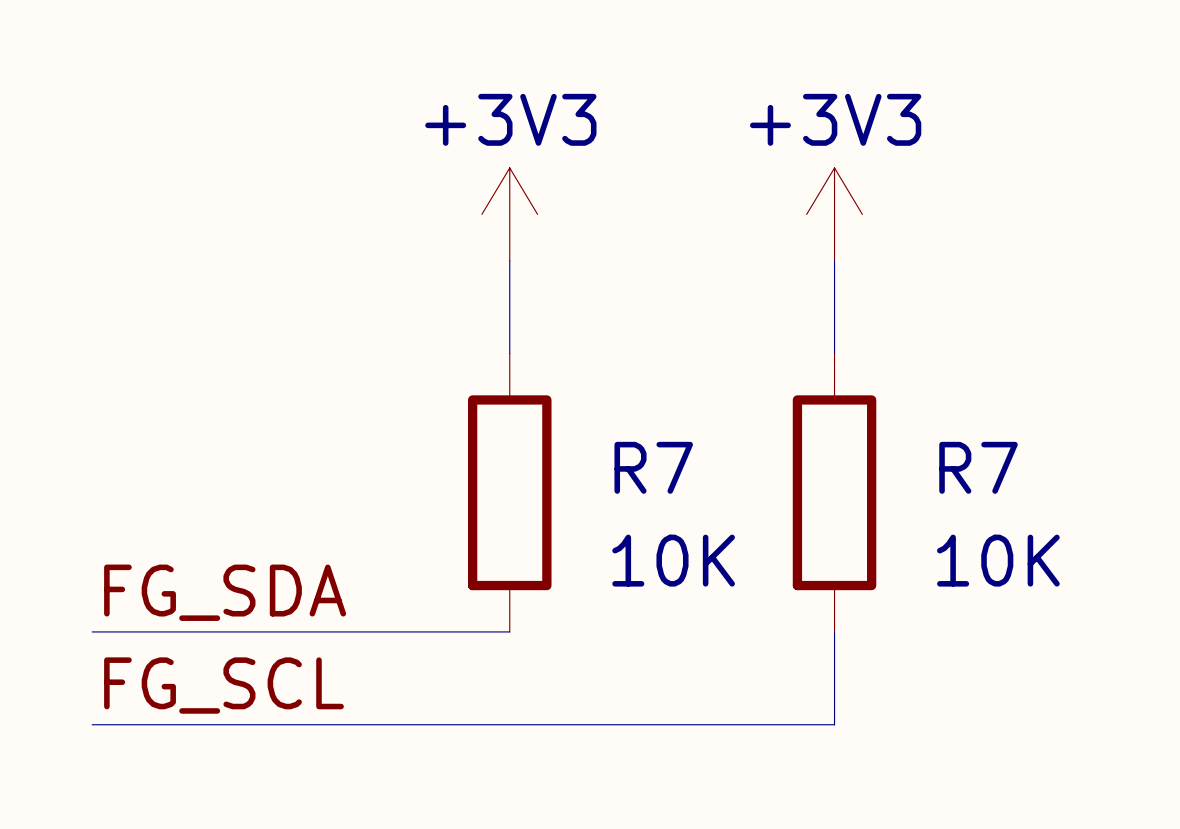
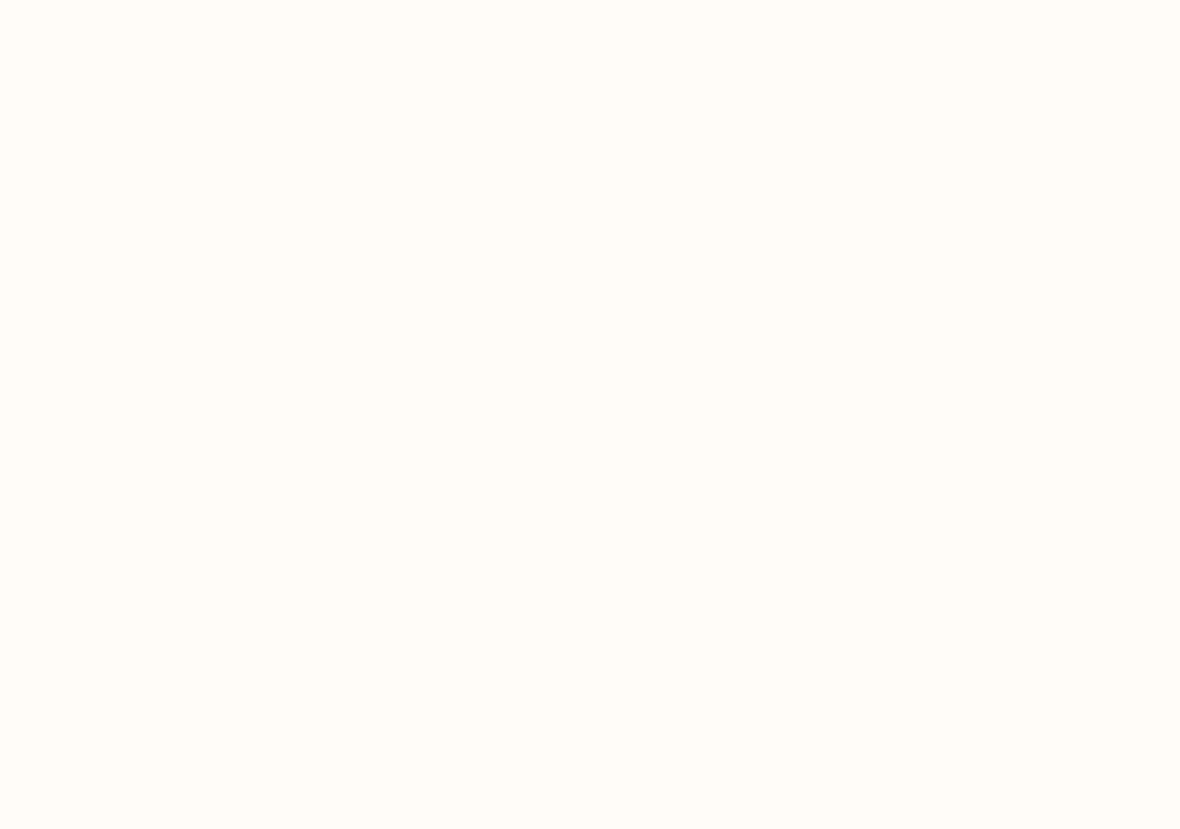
power symbol: +3V3 (509, 214) -> none
power symbol: +3V3 (834, 214) -> none
wire: (509, 260) (509, 353) -> none
wire: (834, 260) (834, 353) -> none
R7: 10K (509, 492) -> none
R7: 10K (834, 492) -> none
label: FG_SDA (225, 592) -> none
wire: (92, 631) (509, 631) -> none
wire: (834, 631) (834, 724) (92, 724) -> none
label: FG_SCL (223, 685) -> none

